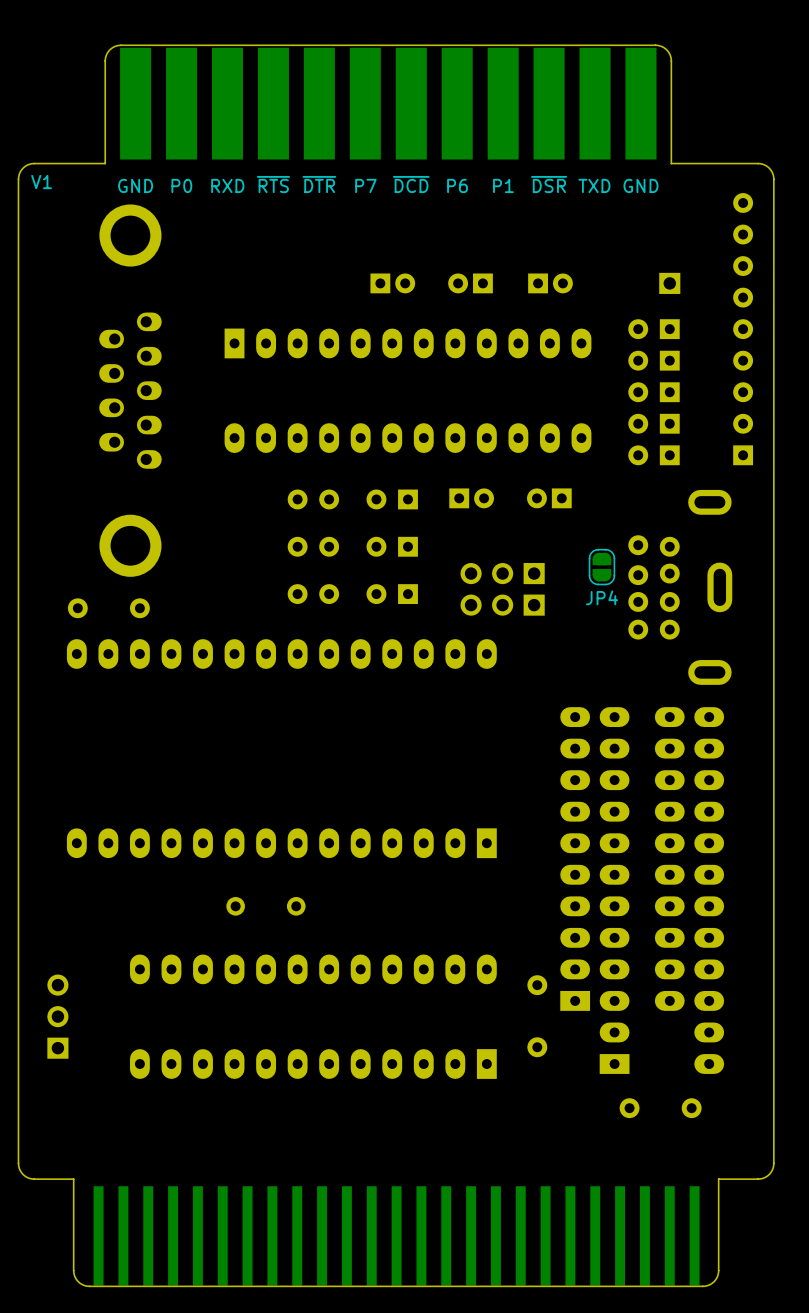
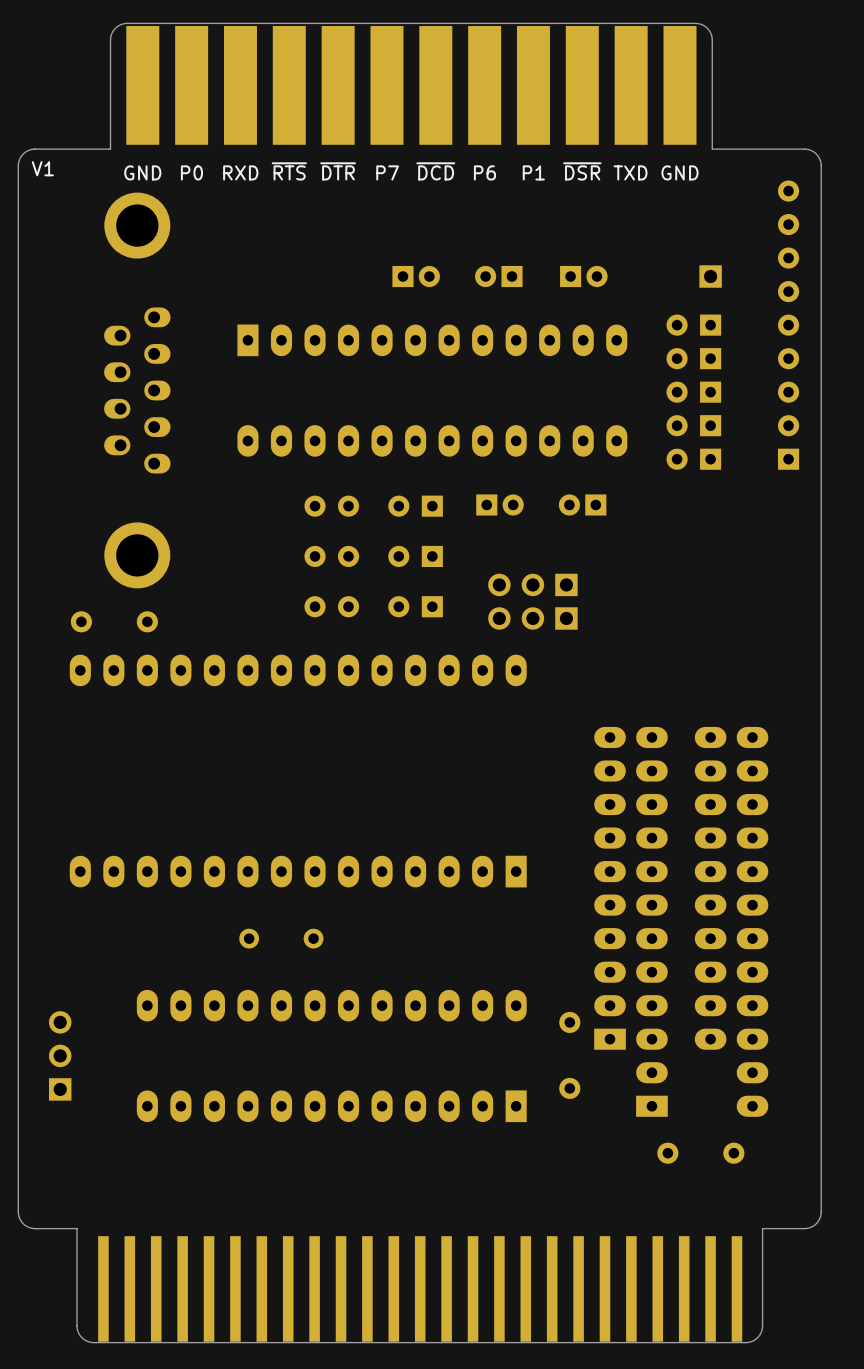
JP4: (601, 567) -> none
part: (680, 587) -> none

